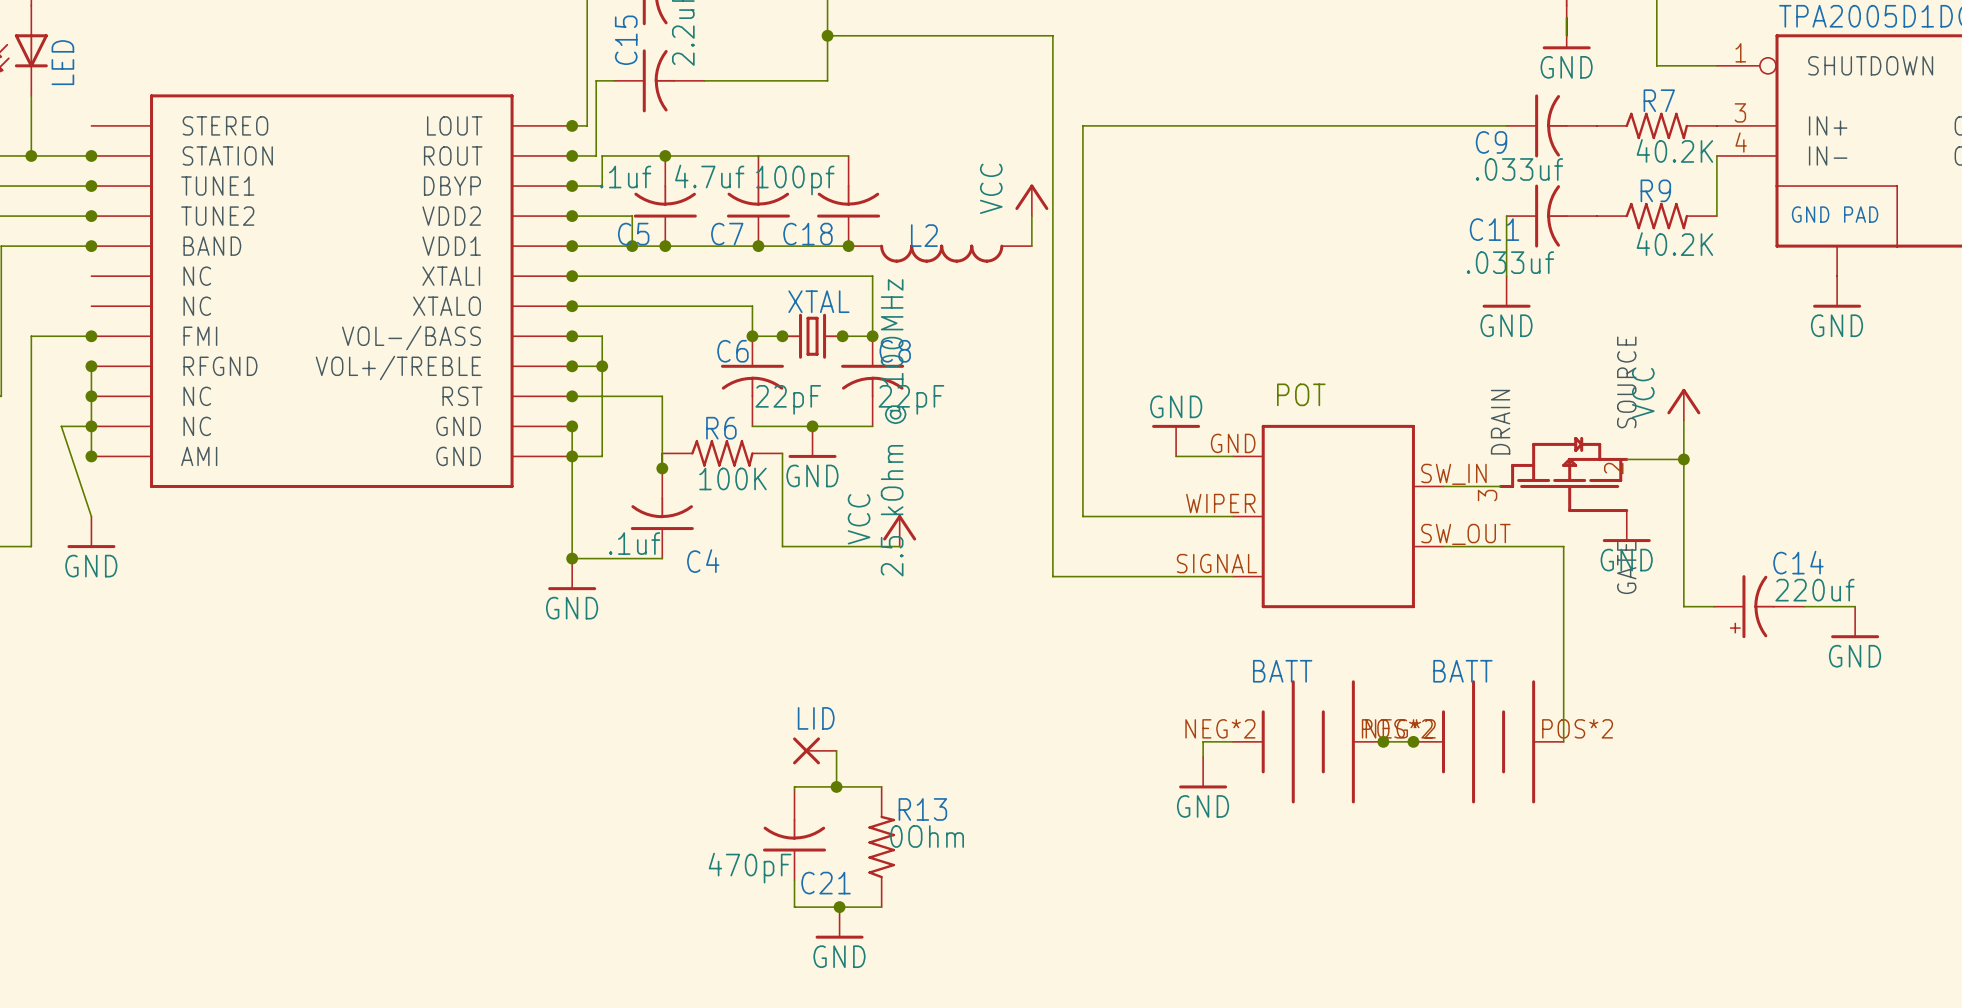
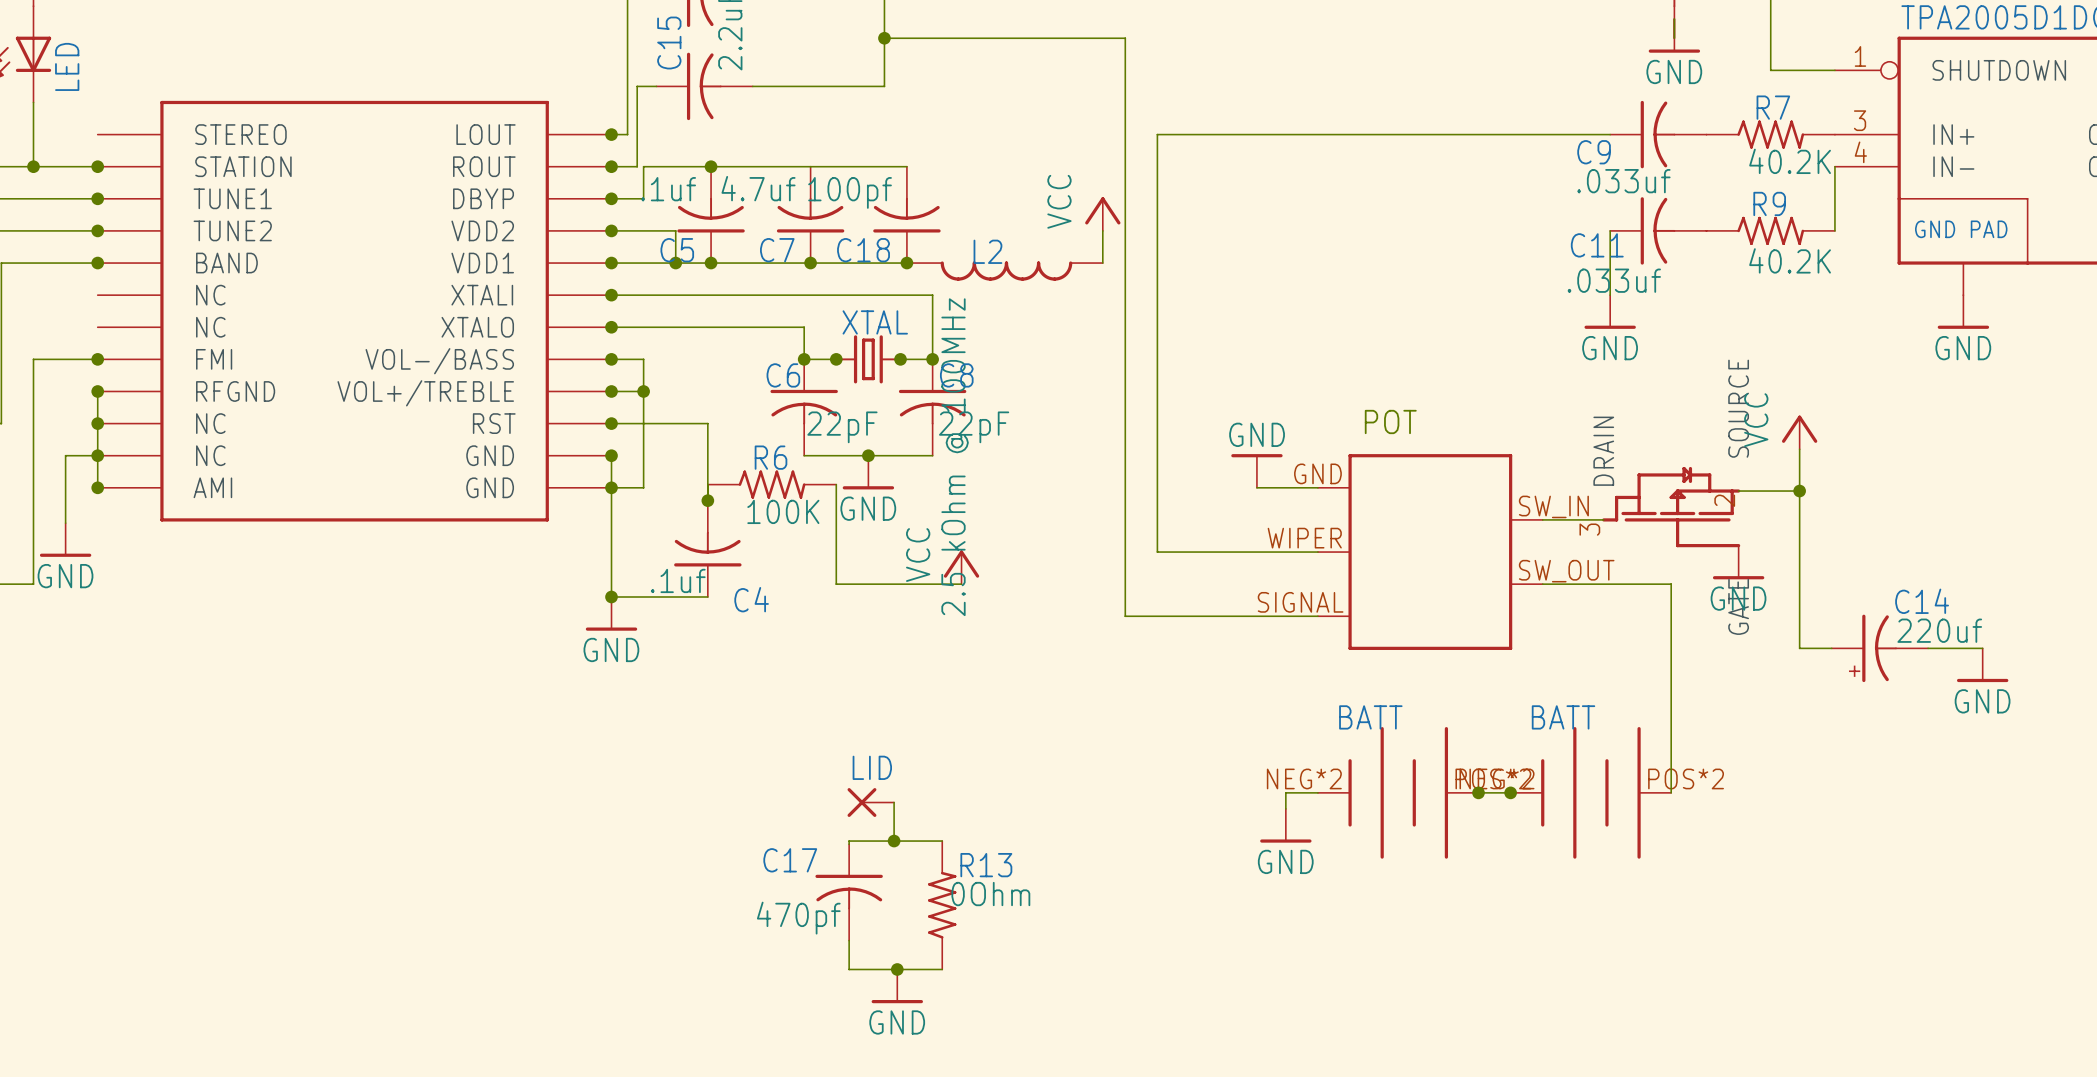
wire: (61, 426) (91, 516) -> (65, 455) (65, 523)
power symbol position: GND (91, 532) -> GND (65, 540)
C21: 470pF (794, 835) -> none
C17: none -> 470pf (849, 892)

